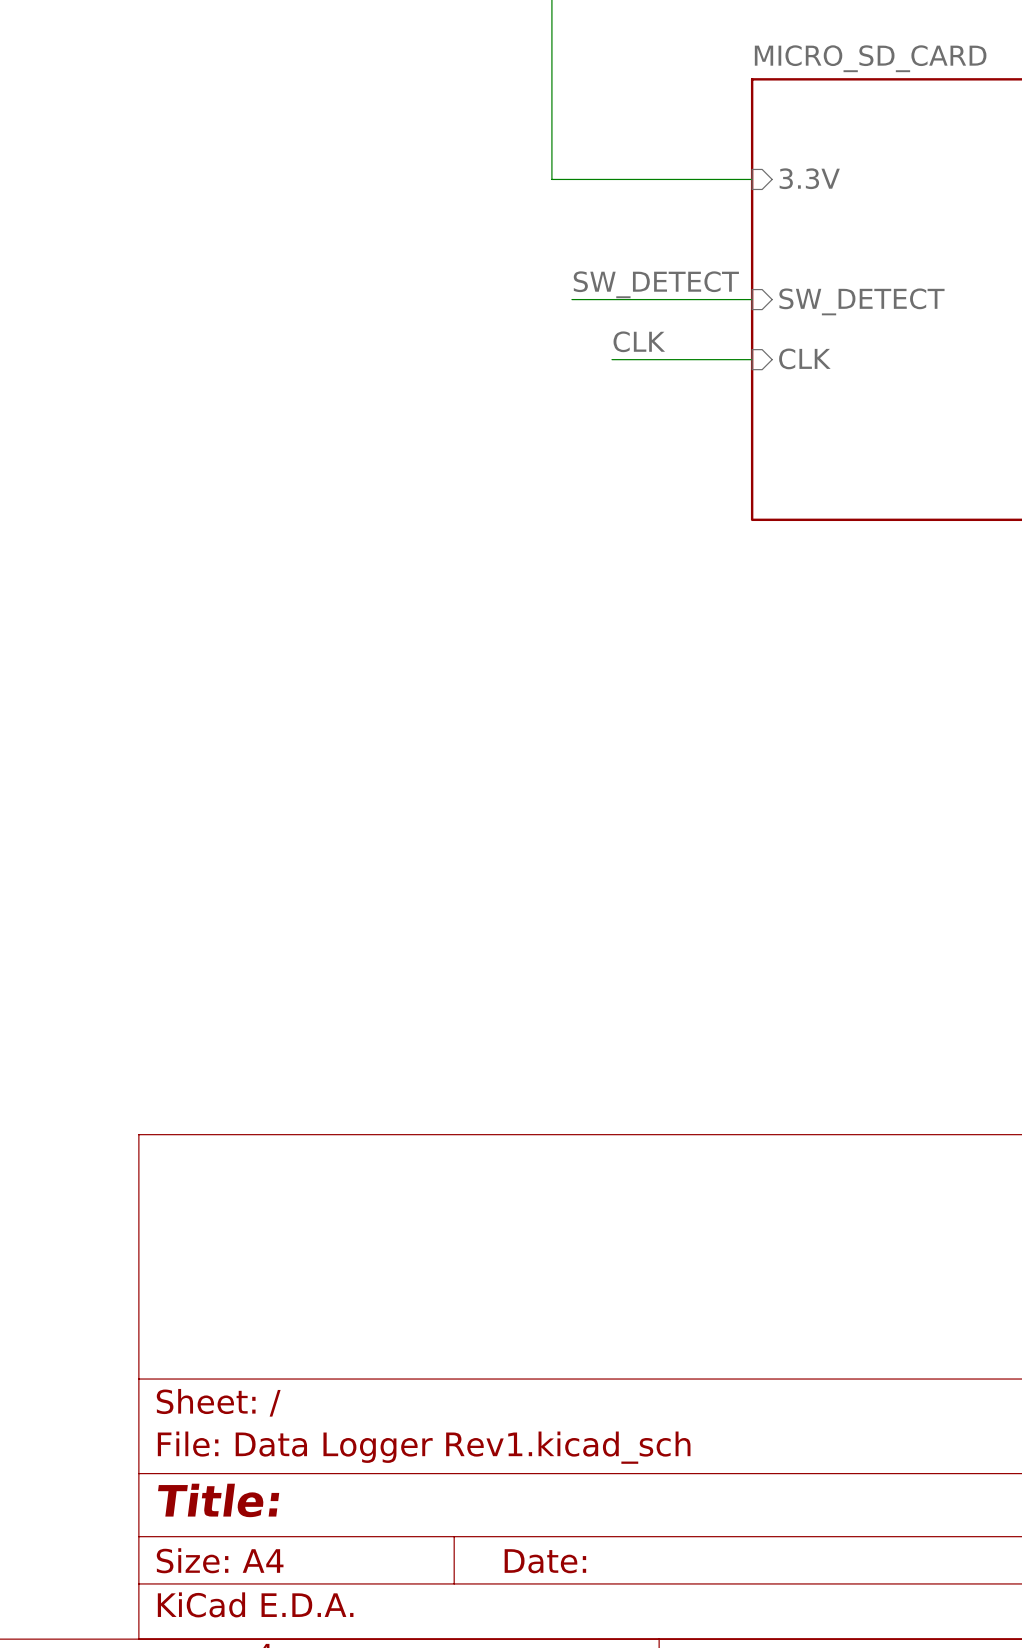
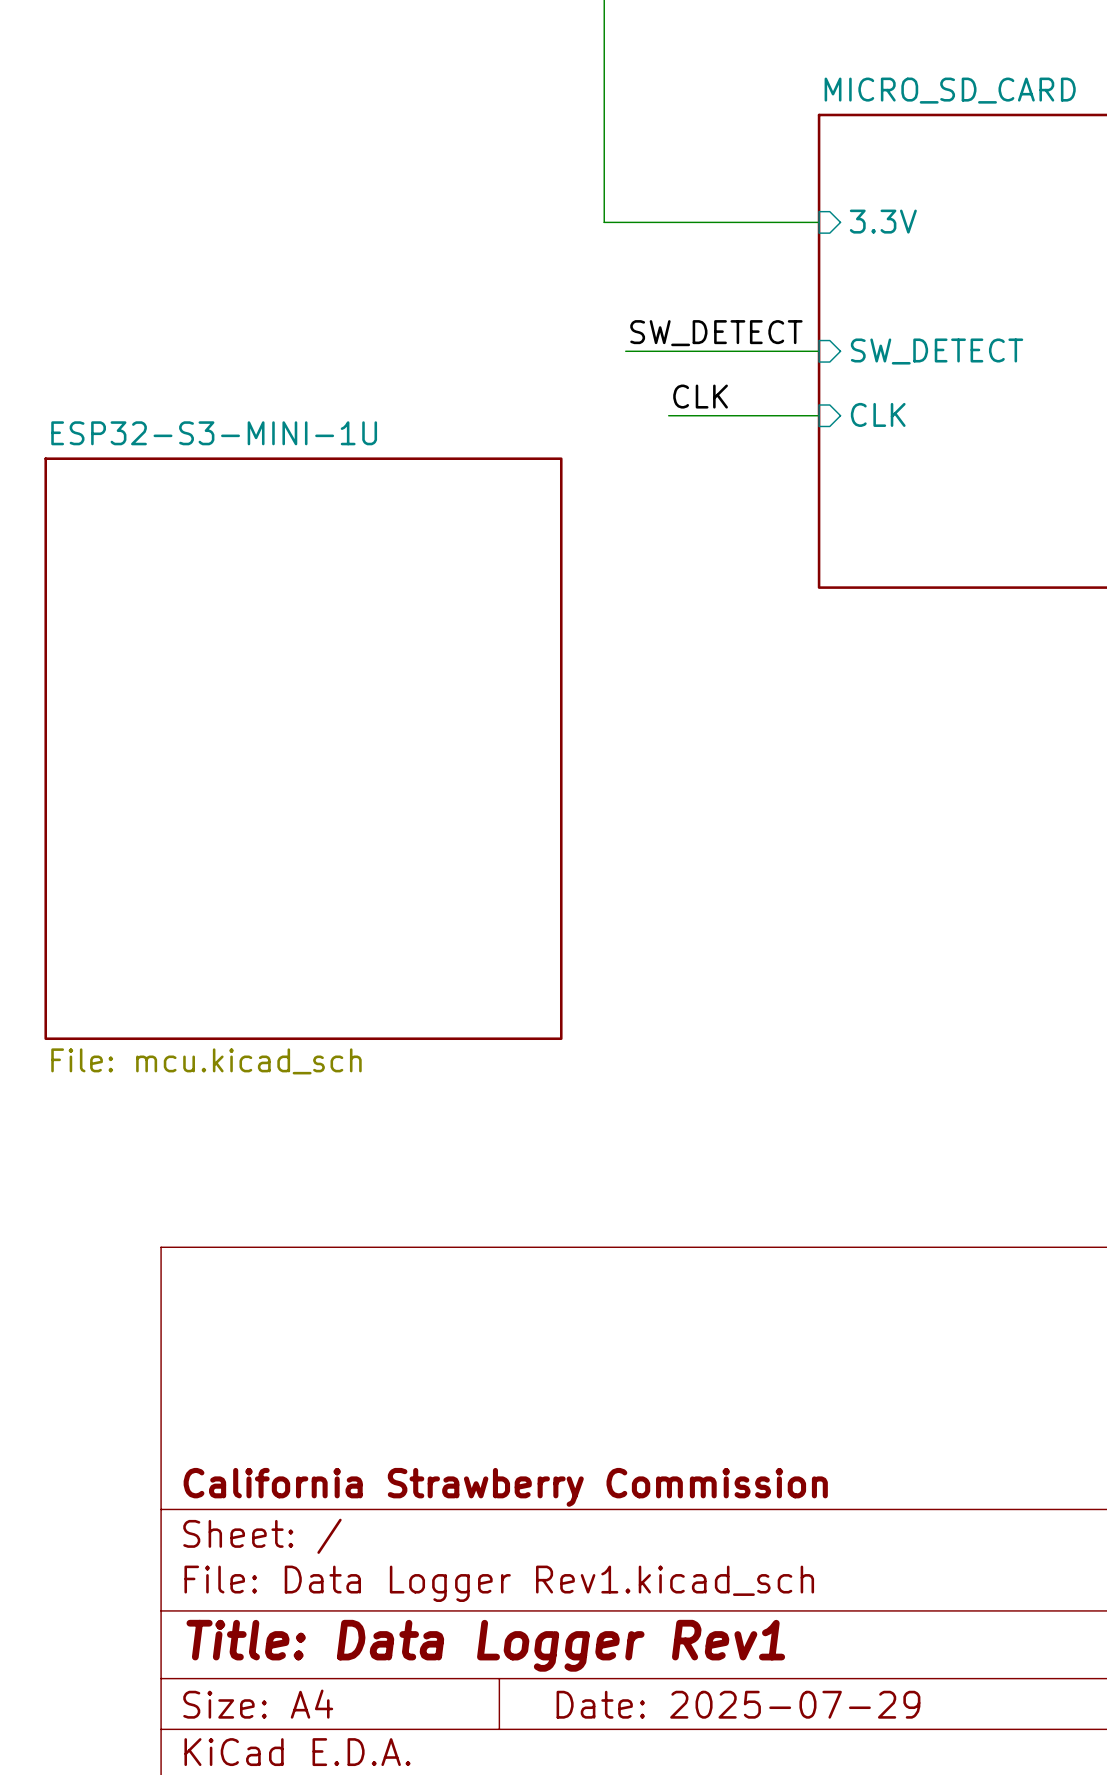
sheet ESP32-S3-MINI-1U: none -> File: mcu.kicad_sch (303, 748)
title block: none -> California Strawberry Commission (505, 1487)
title block: Title: (218, 1500) -> Title: Data Logger Rev1 (485, 1645)
title block: Date: (545, 1561) -> Date: 2025-07-29 (738, 1704)

